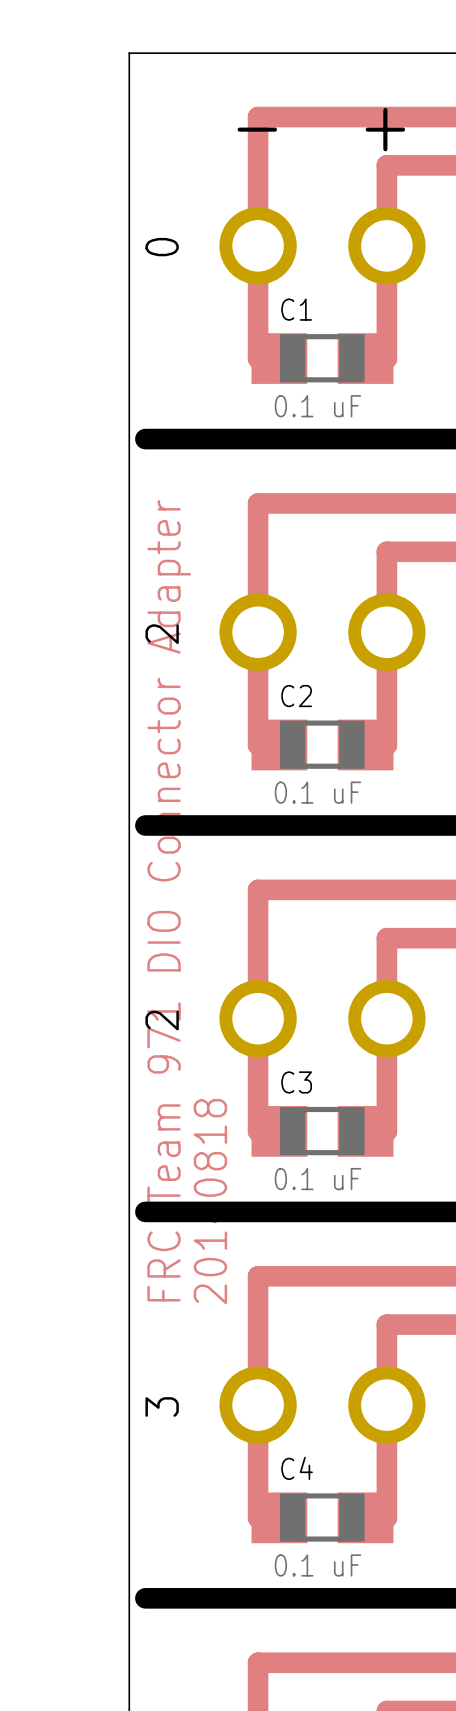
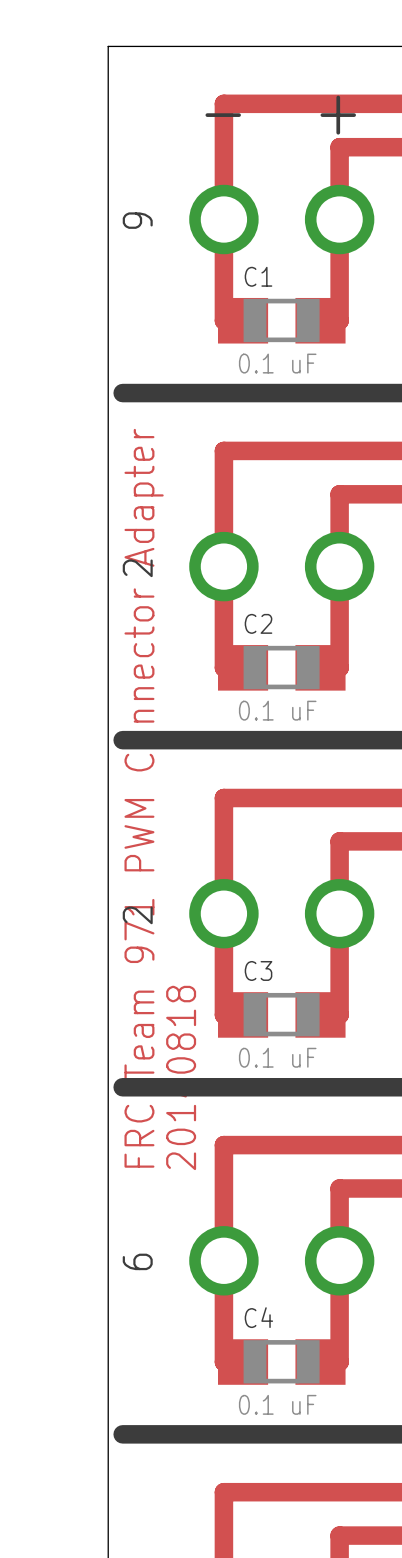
text: 0 (162, 247) -> 9 (137, 220)
text: FRC Team 971 DIO Connector Adapter (169, 900) -> FRC Team 971 PWM Connector Adapter (144, 798)
text: 3 (162, 1407) -> 6 (137, 1261)

